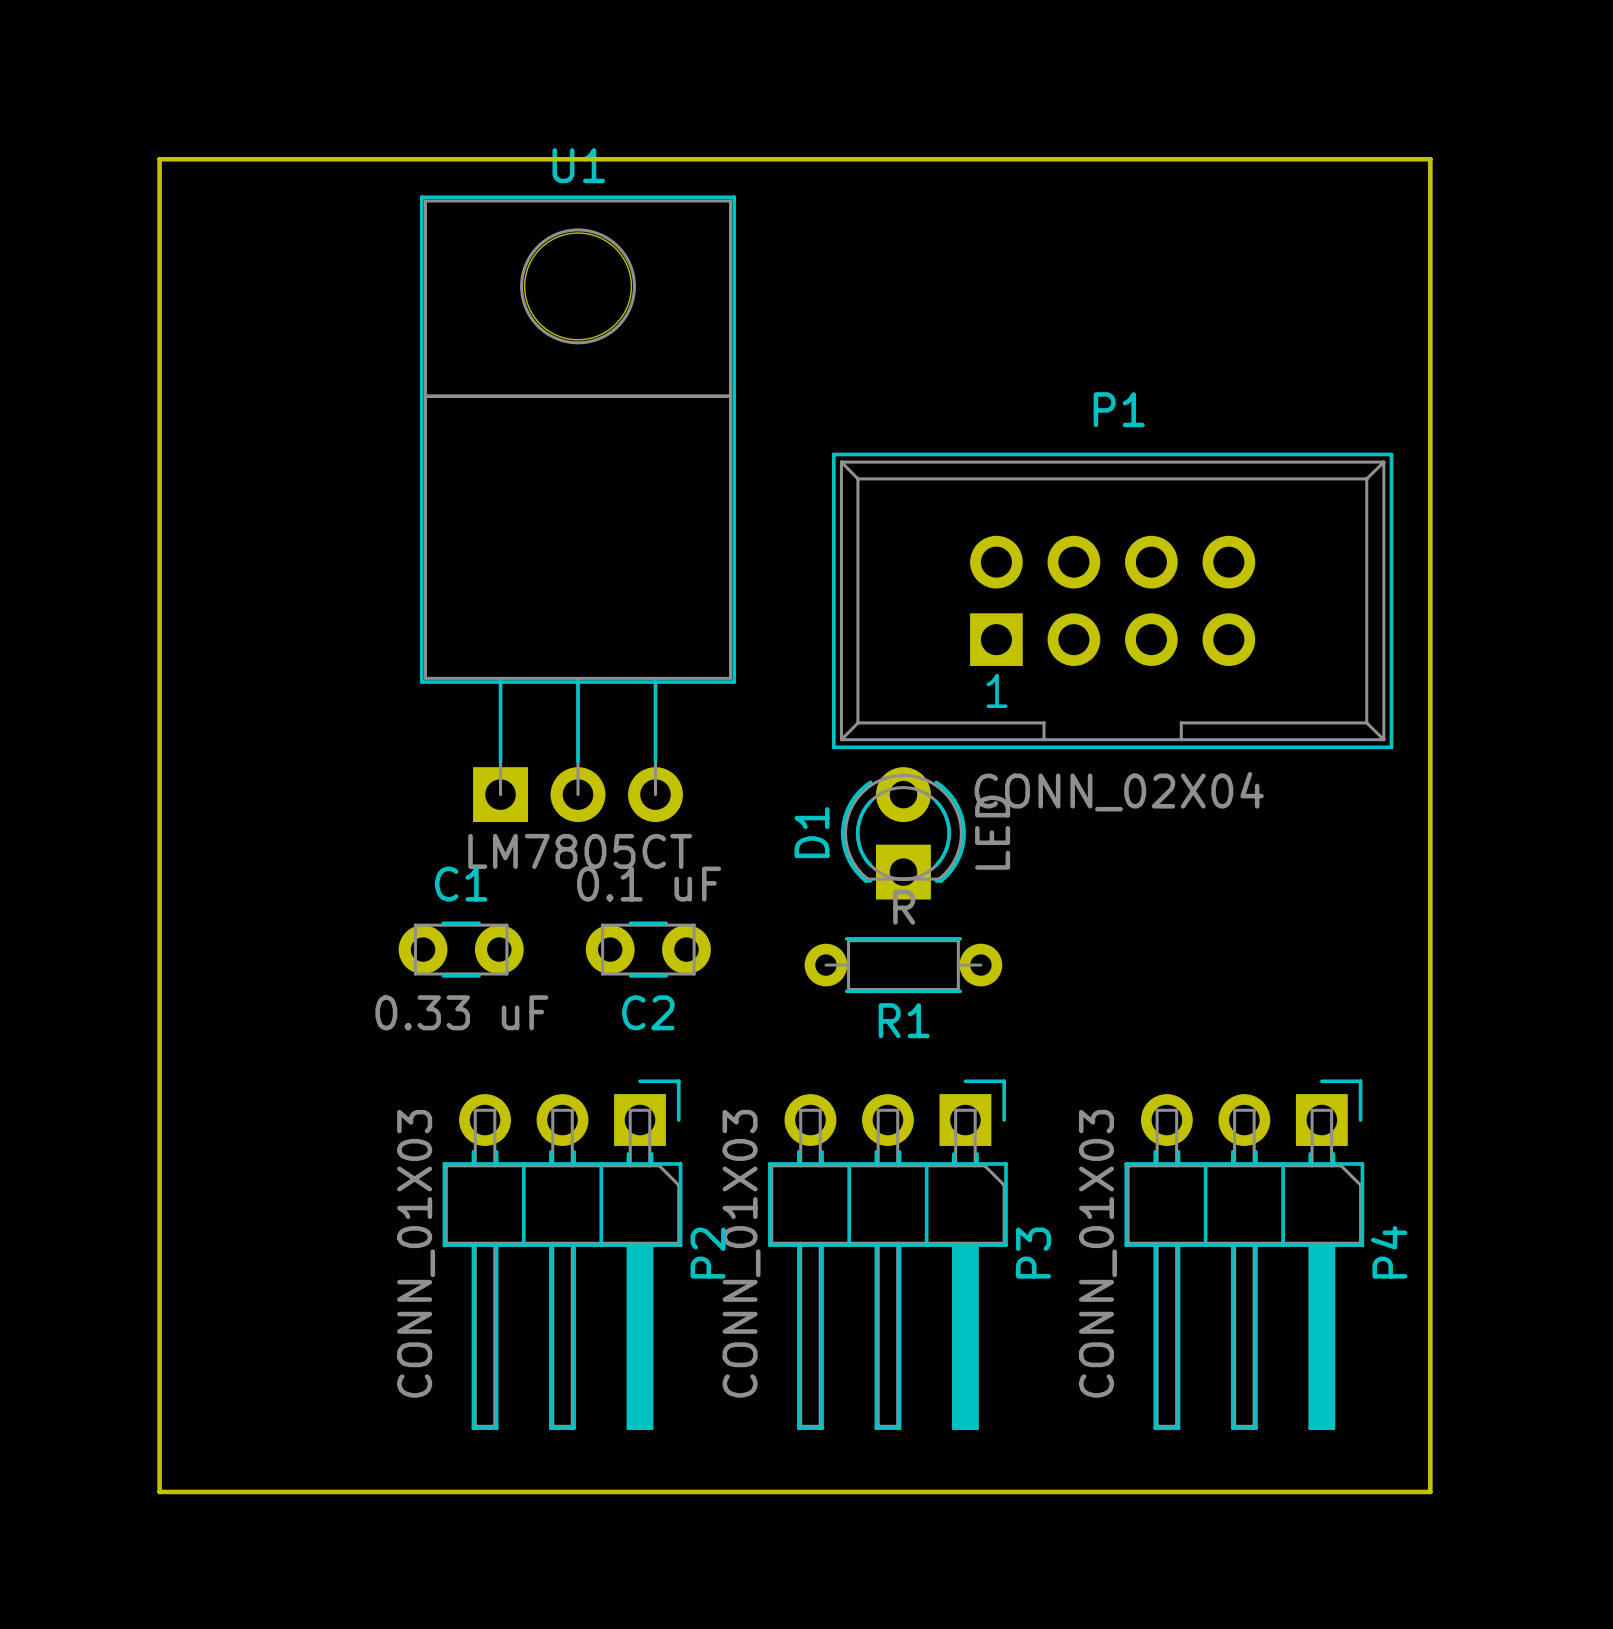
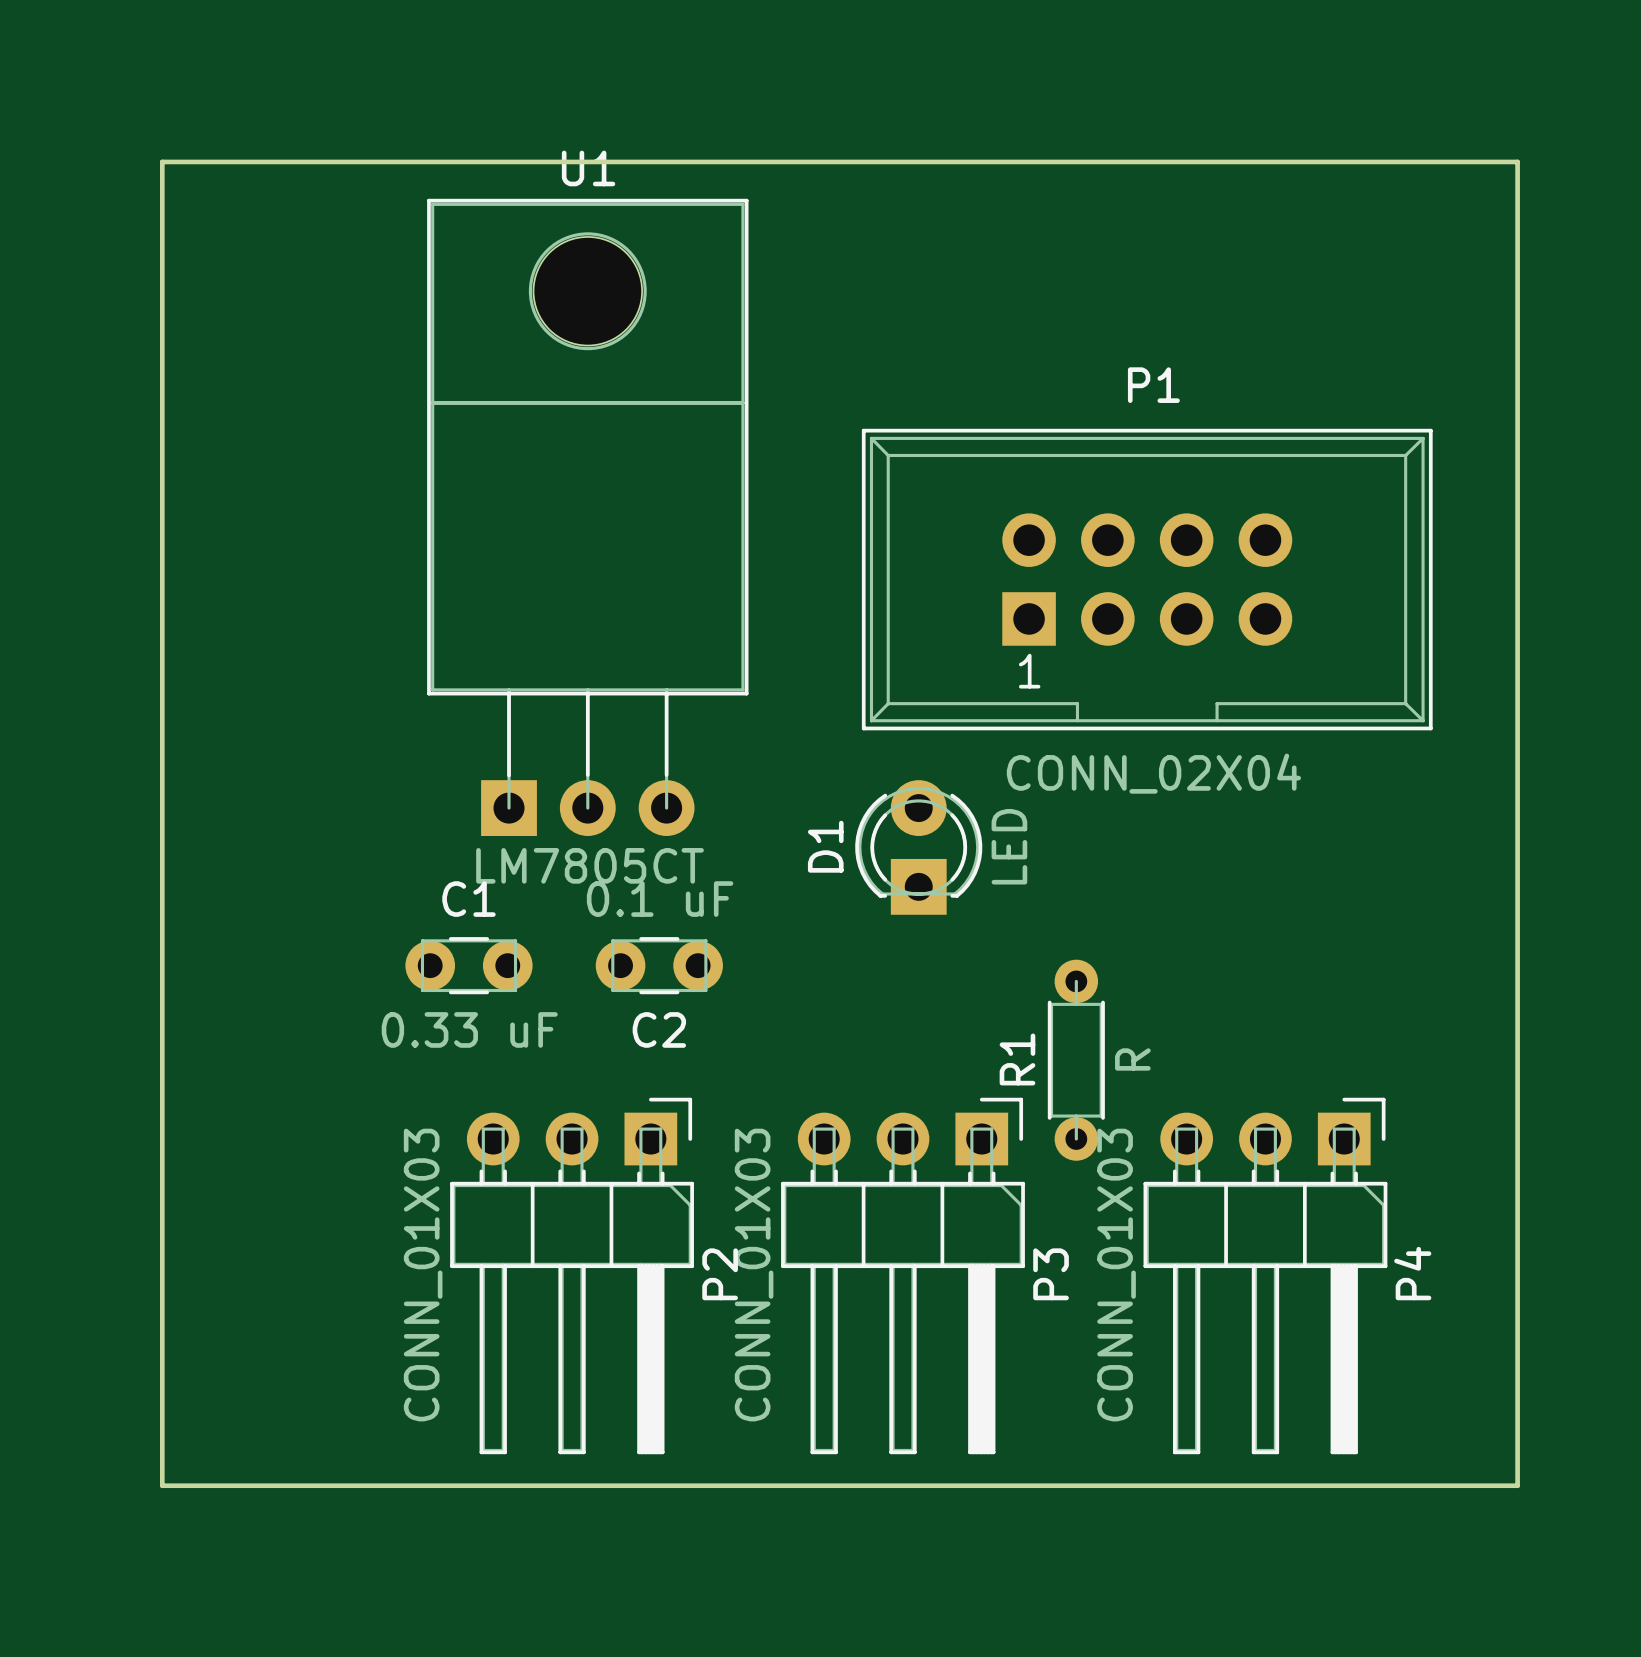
board edge: (1430, 159) (1430, 1491) (159, 1491) (159, 1460) -> (1454, 161) (1517, 161) (1517, 1485) (162, 1485)
P1 position: (1112, 600) -> (1147, 579)
R1 rotation: 0° (903, 965) -> 90° clockwise (1076, 1060)
R1 position: (903, 965) -> (1076, 1060)

